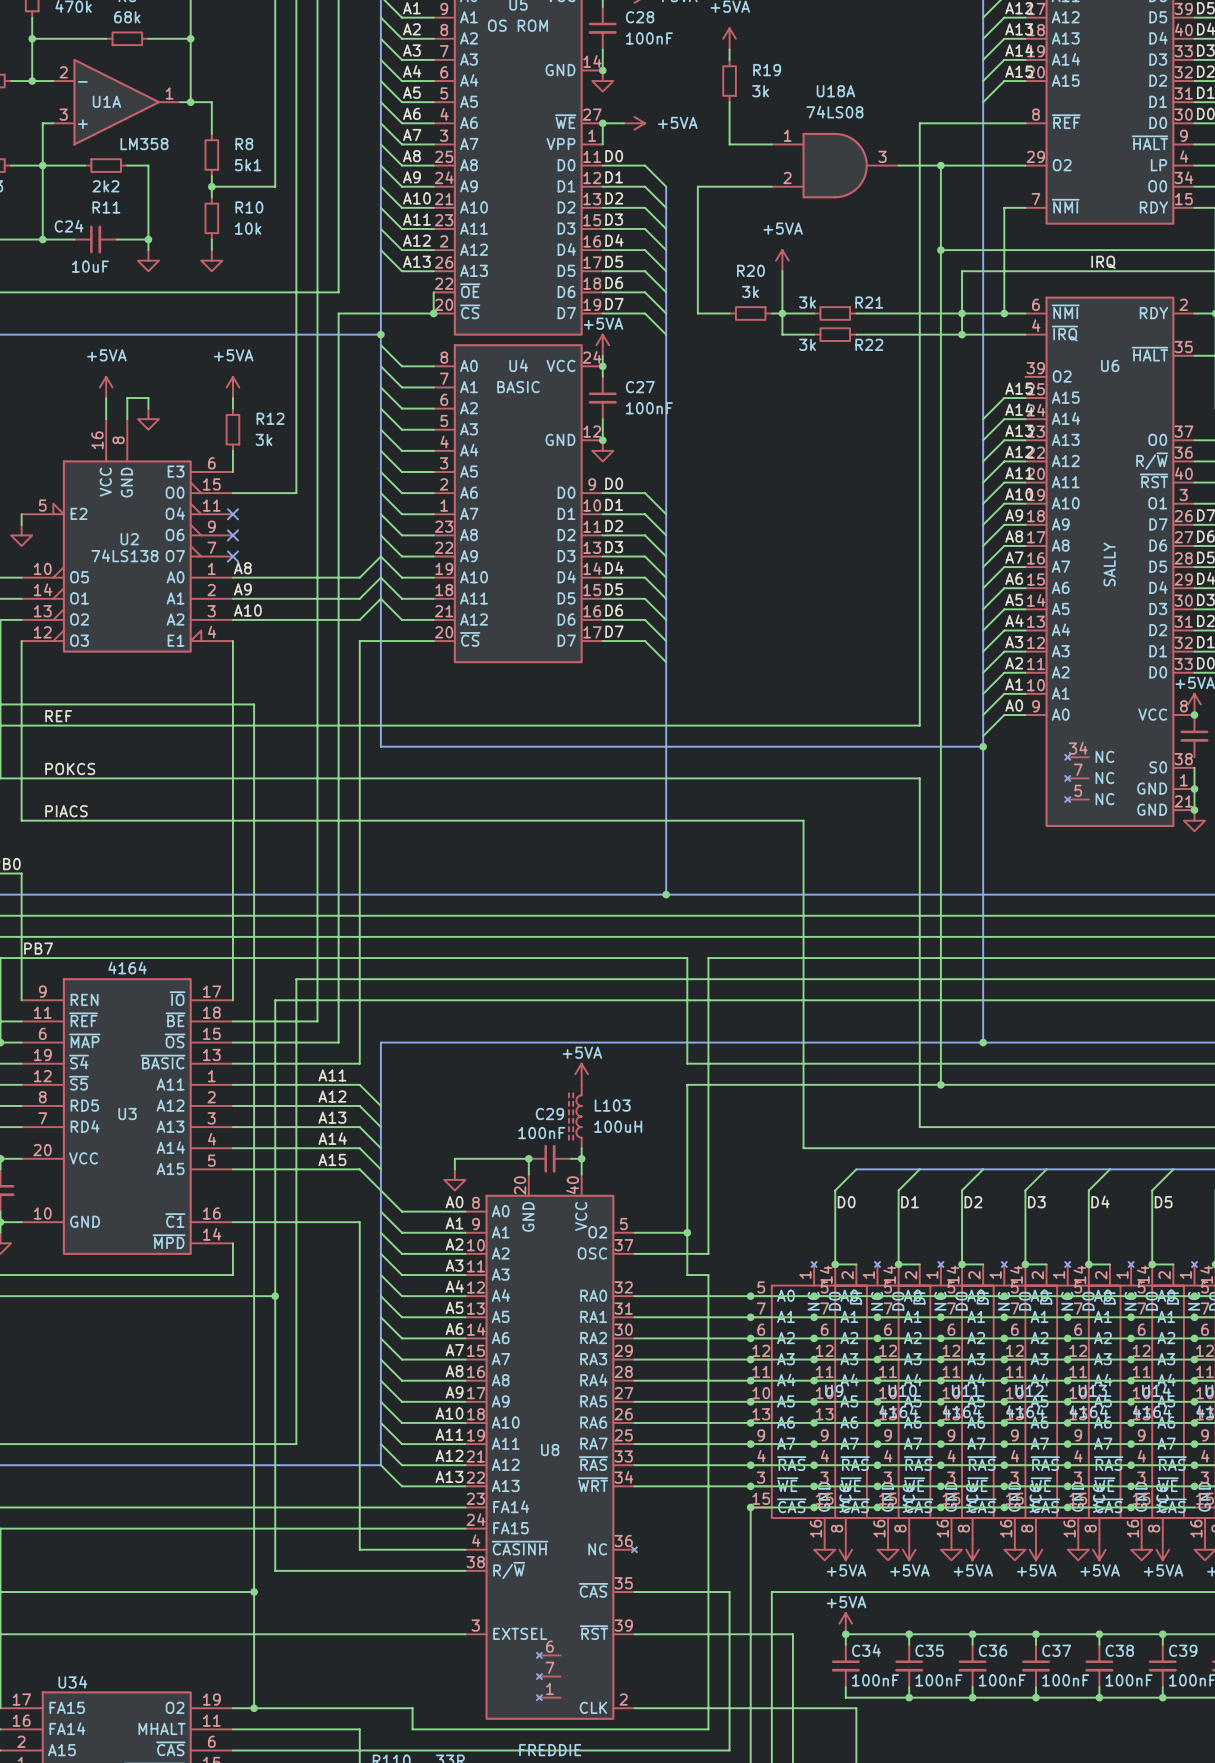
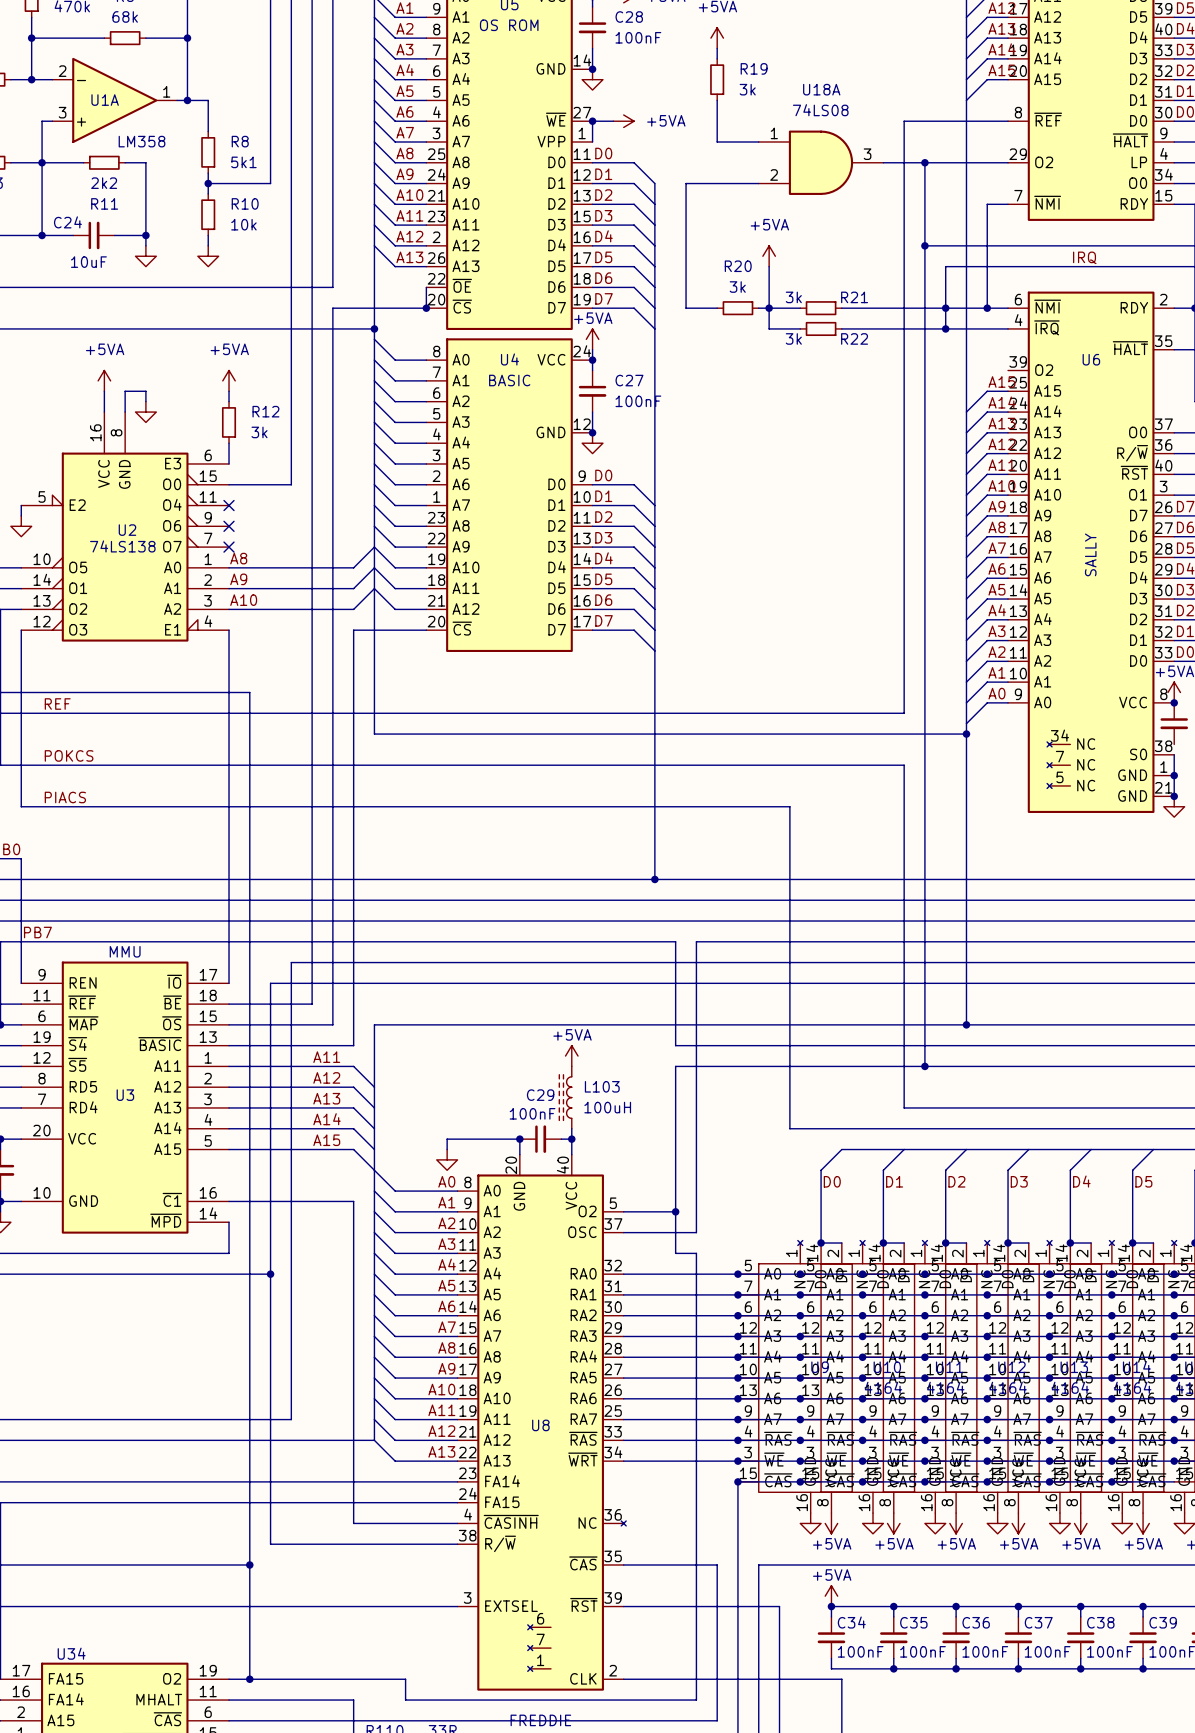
U3 value: 4164 (127, 967) -> MMU (125, 951)

